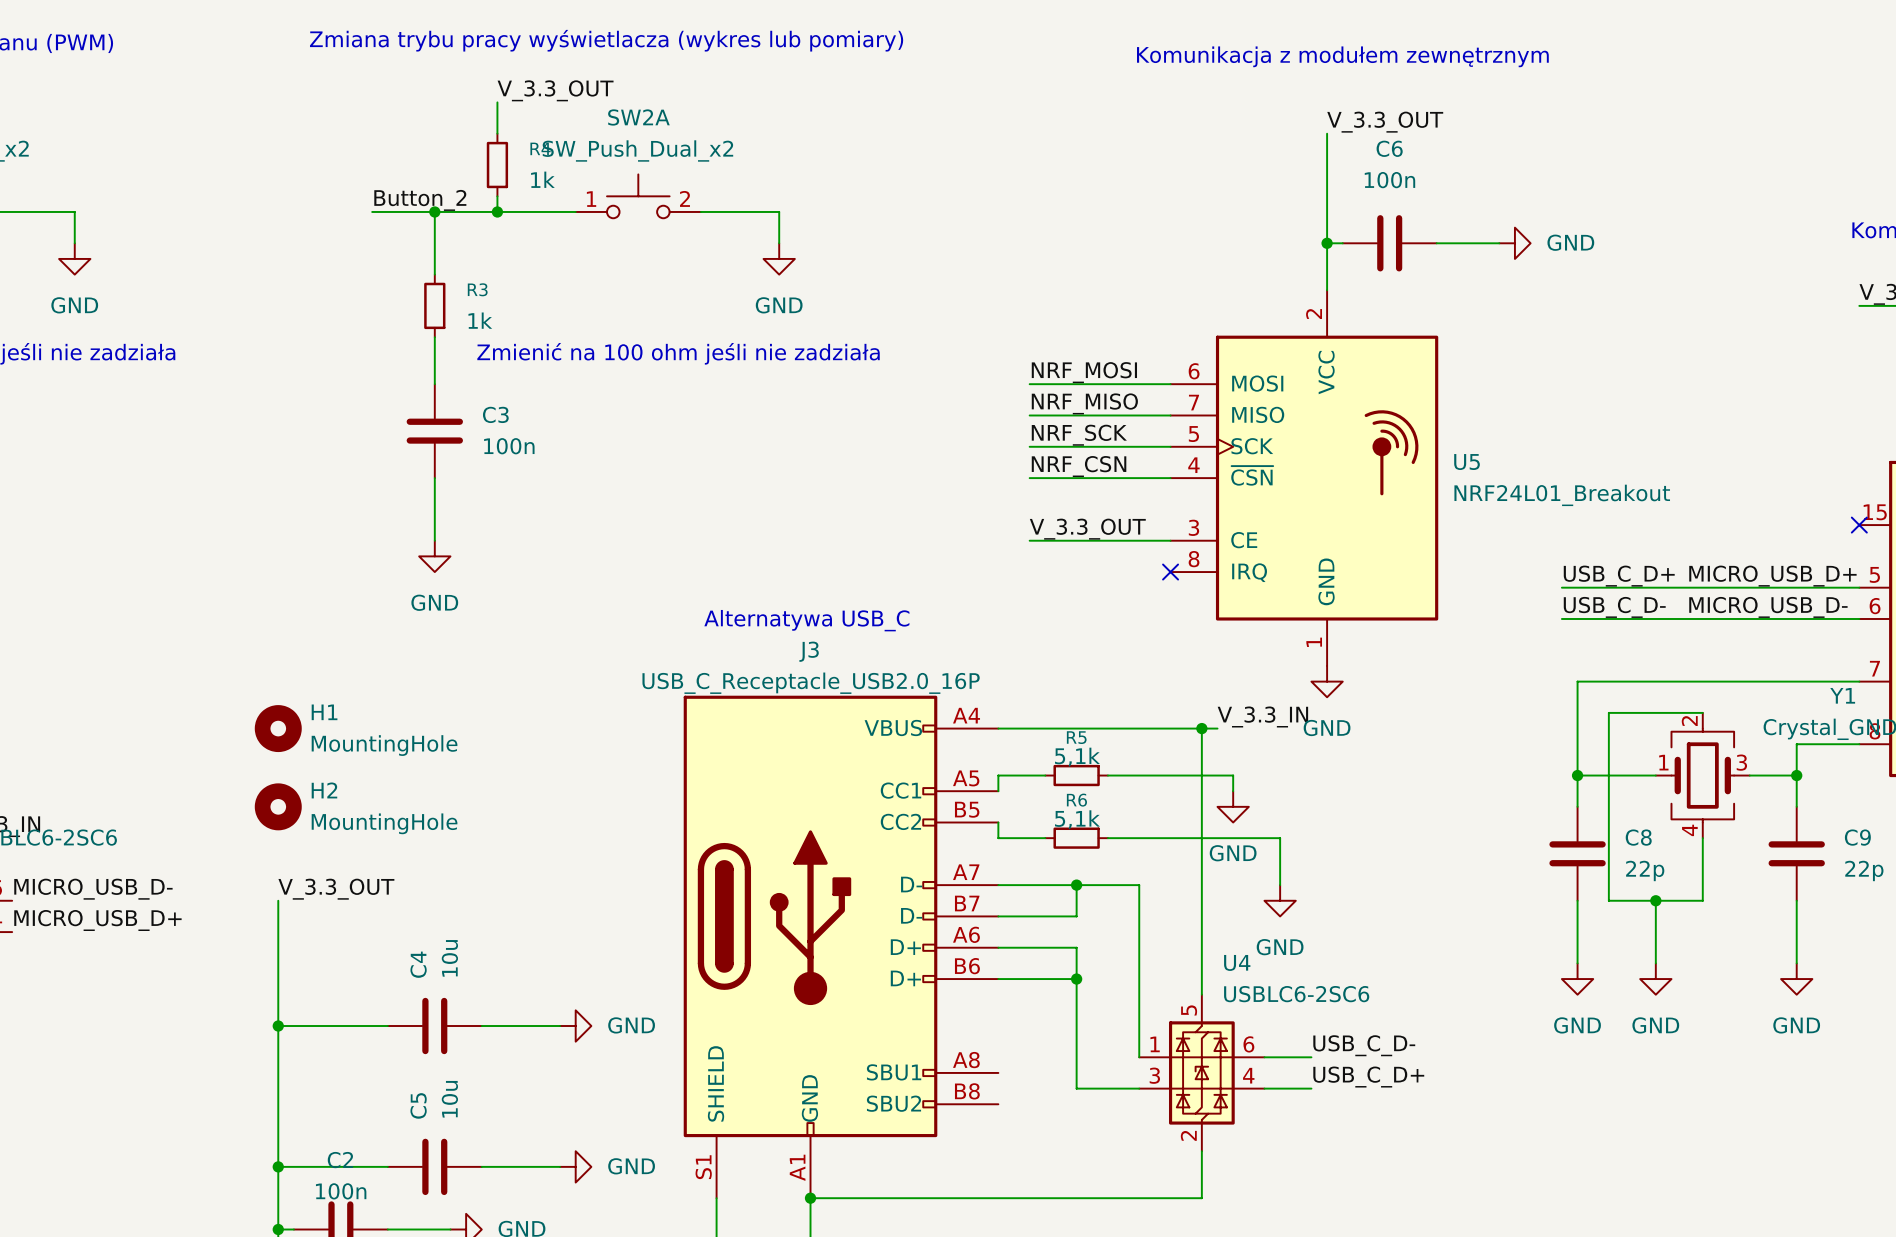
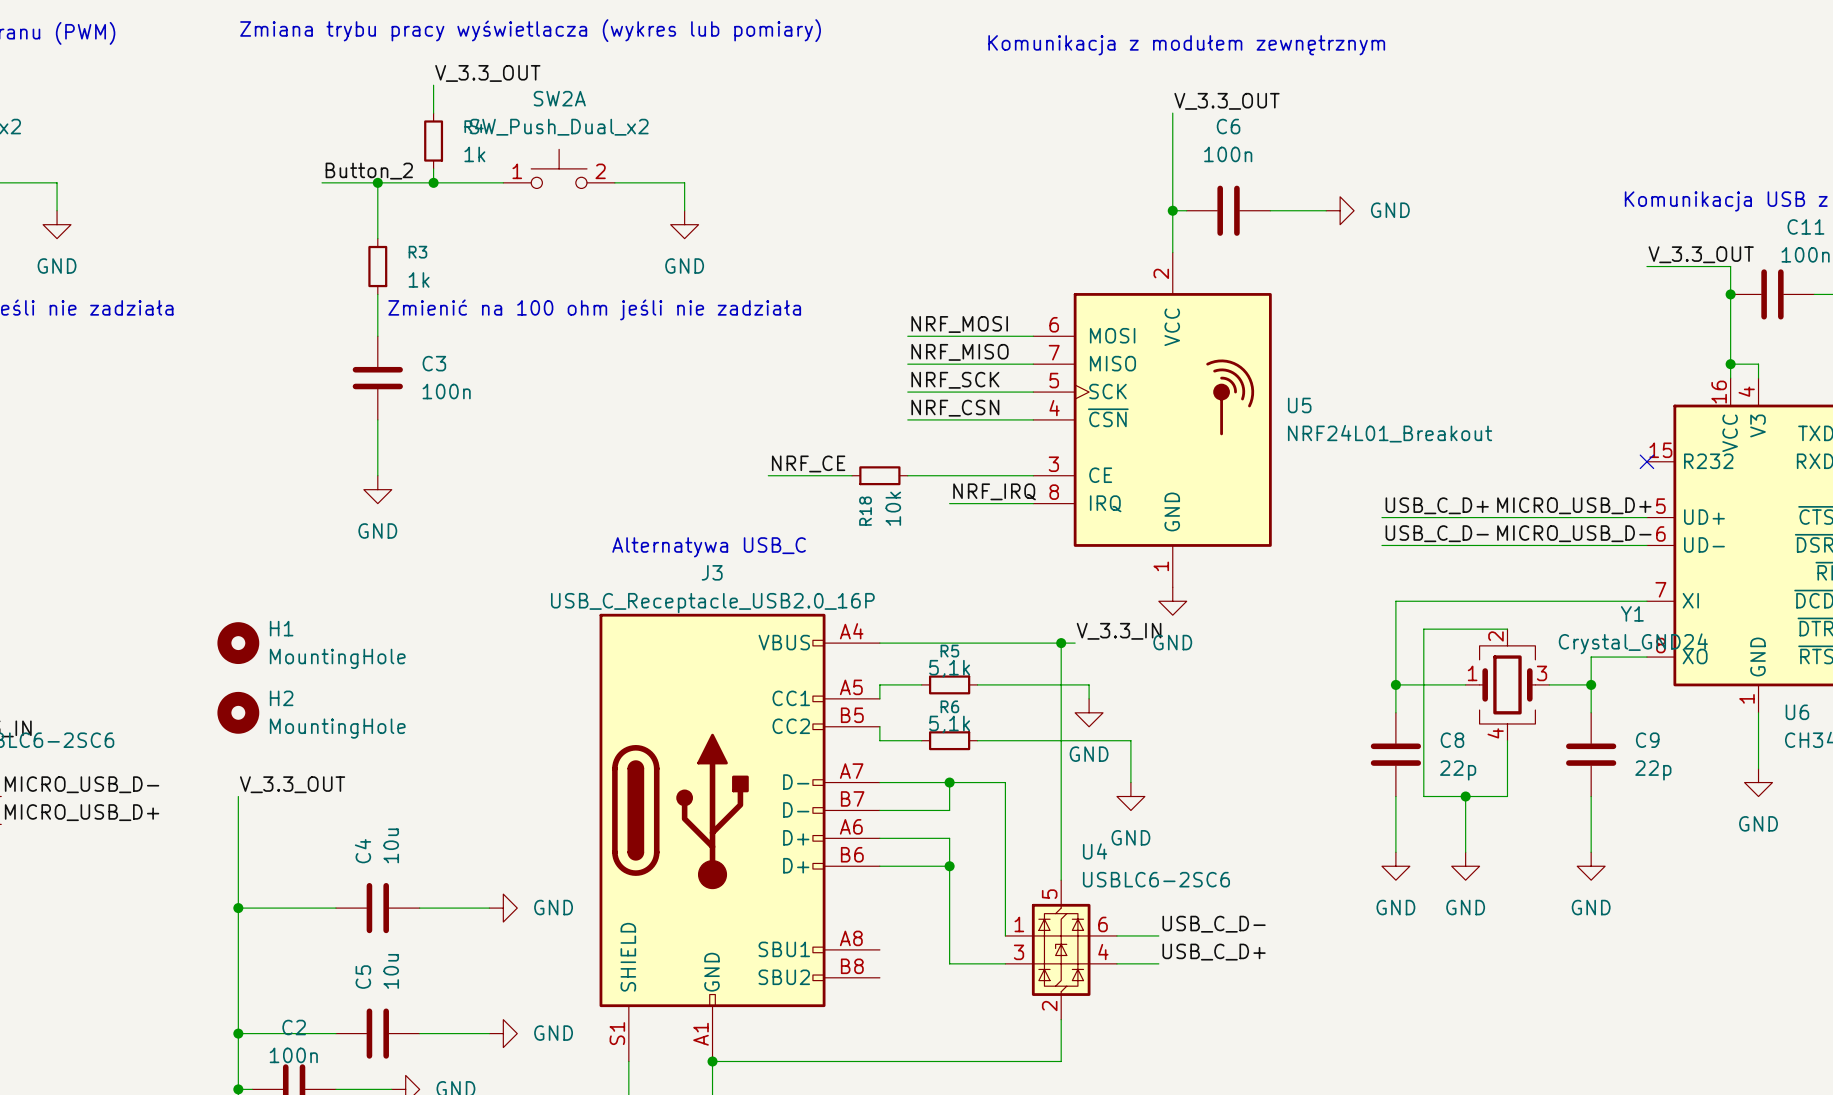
label: none -> NRF_CE (808, 463)
label: V_3.3_OUT (1087, 529) -> none
wire: none -> (768, 475) (851, 475)
R18: none -> 10k (879, 475)
label: none -> NRF_IRQ (994, 491)
wire: none -> (949, 503) (1033, 503)
no-connect mark: (1170, 572) -> none

